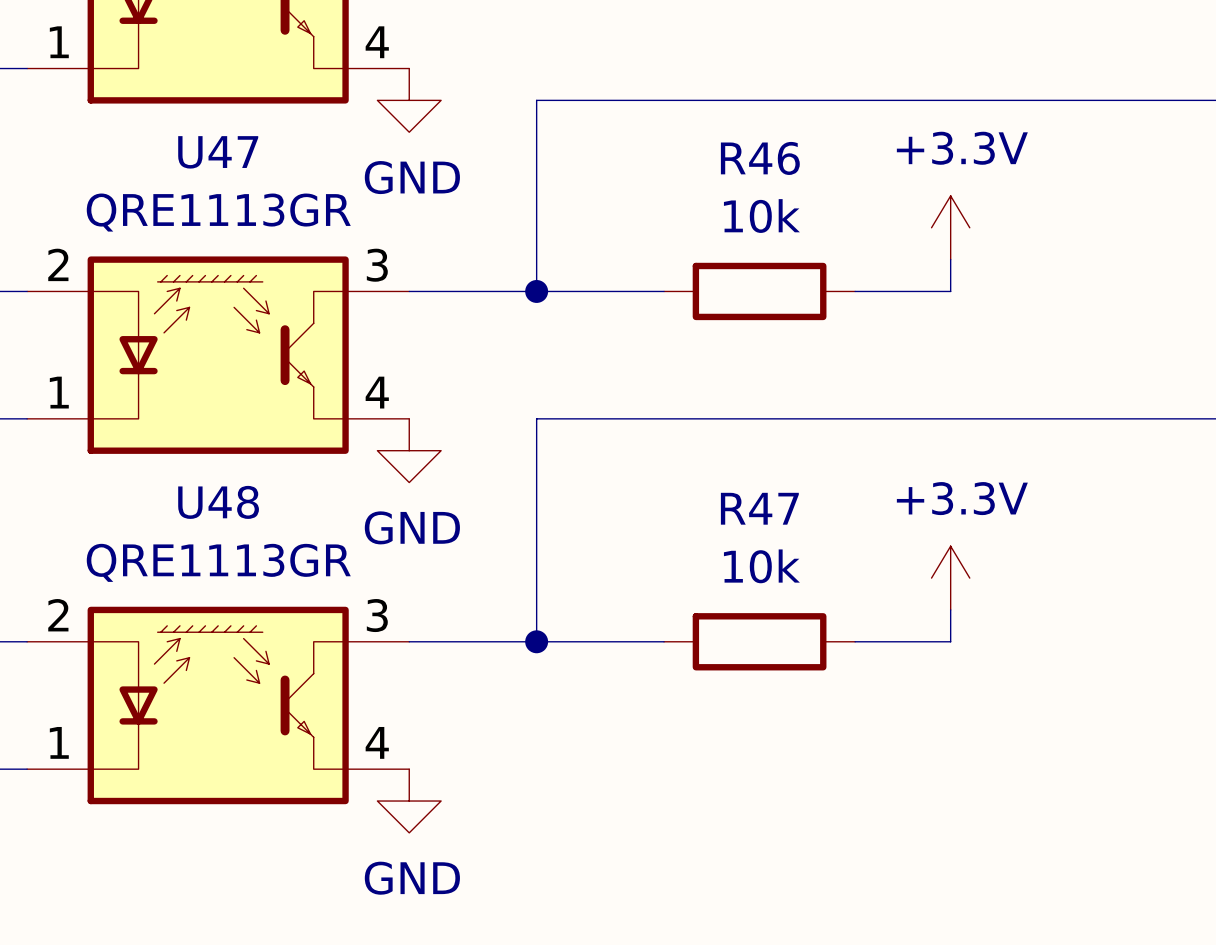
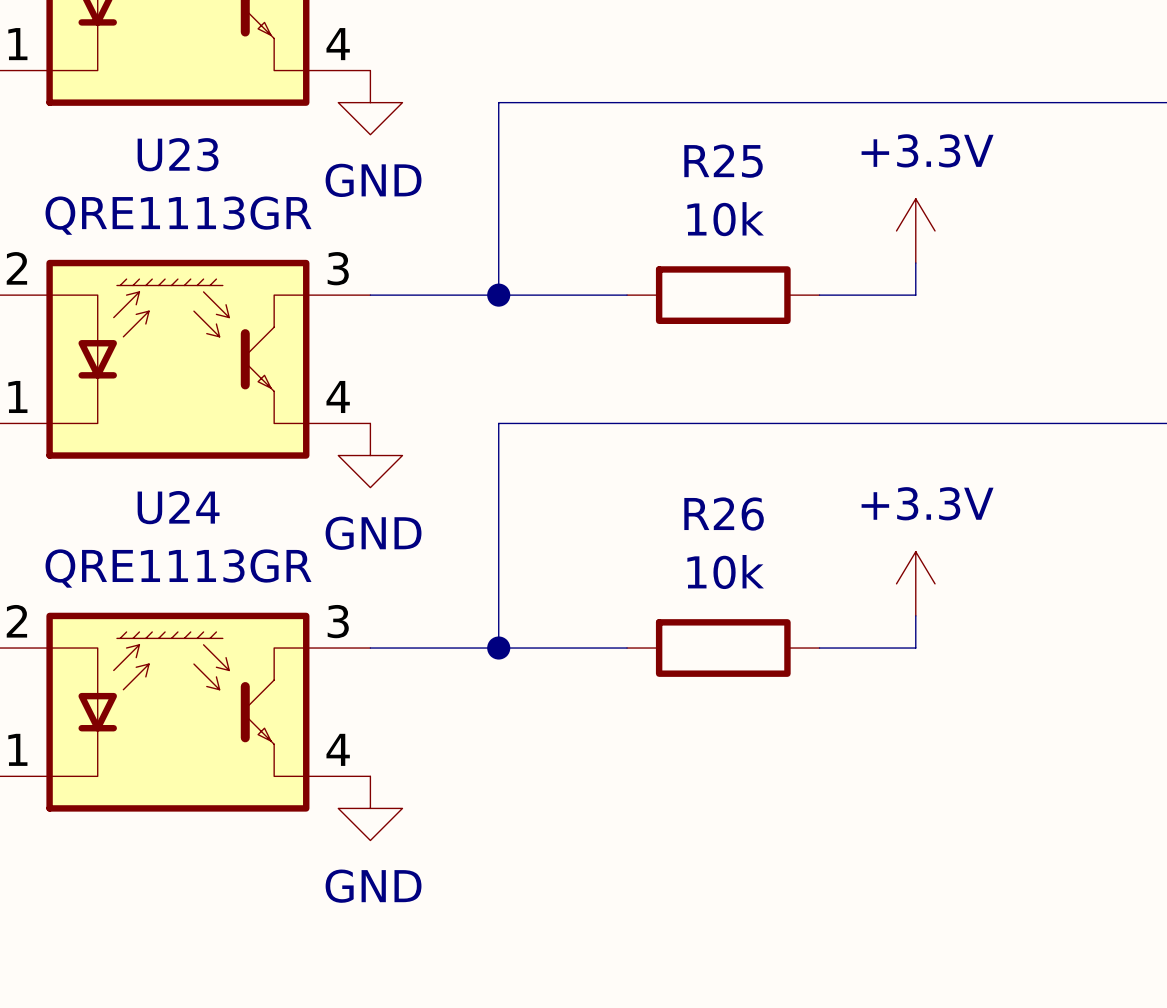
U47 name: U47 (218, 152) -> U23 (178, 154)
R46 name: R46 (760, 158) -> R25 (723, 161)
U48 name: U48 (218, 502) -> U24 (178, 507)
R47 name: R47 (759, 508) -> R26 (724, 514)

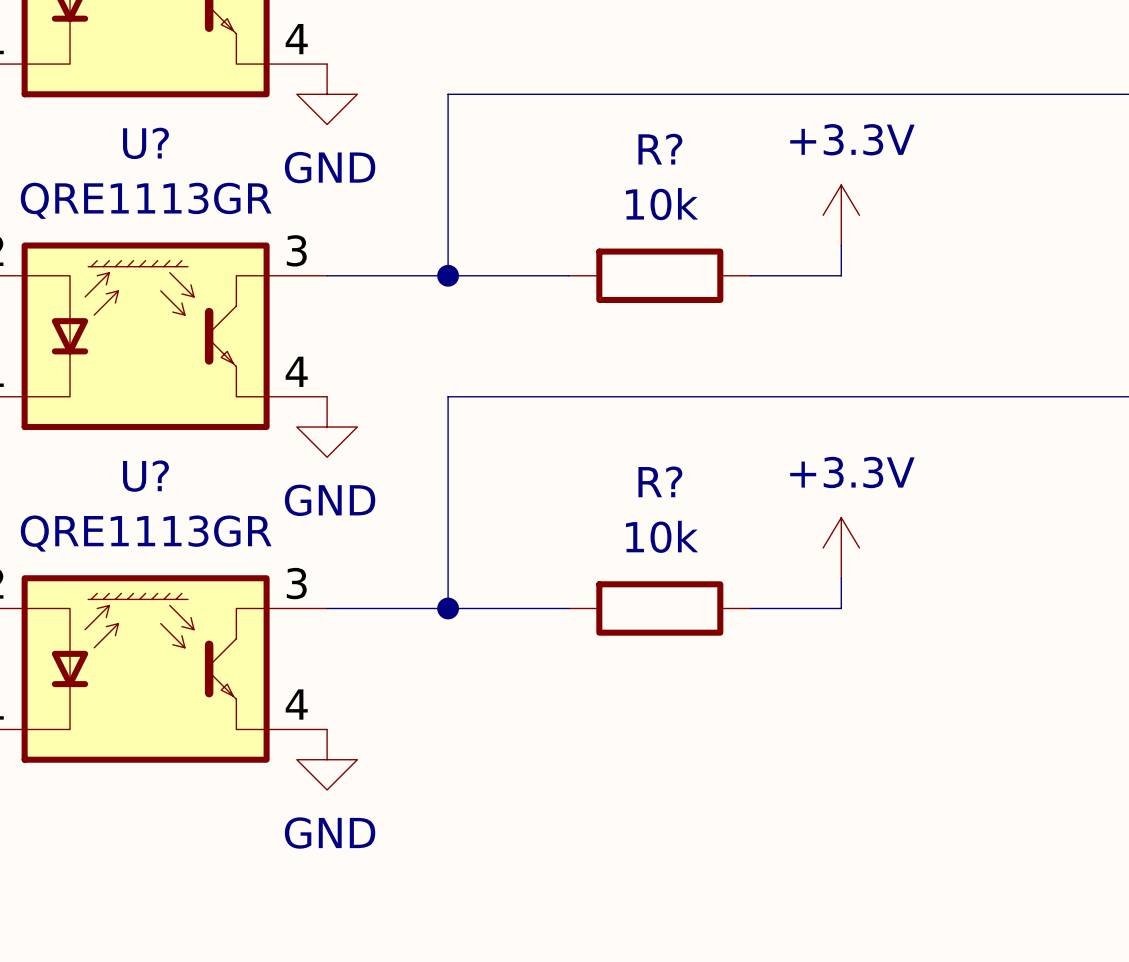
U23 name: U23 (178, 154) -> U? (145, 143)
R25 name: R25 (723, 161) -> R? (660, 149)
U24 name: U24 (178, 507) -> U? (145, 476)
R26 name: R26 (724, 514) -> R? (660, 481)

